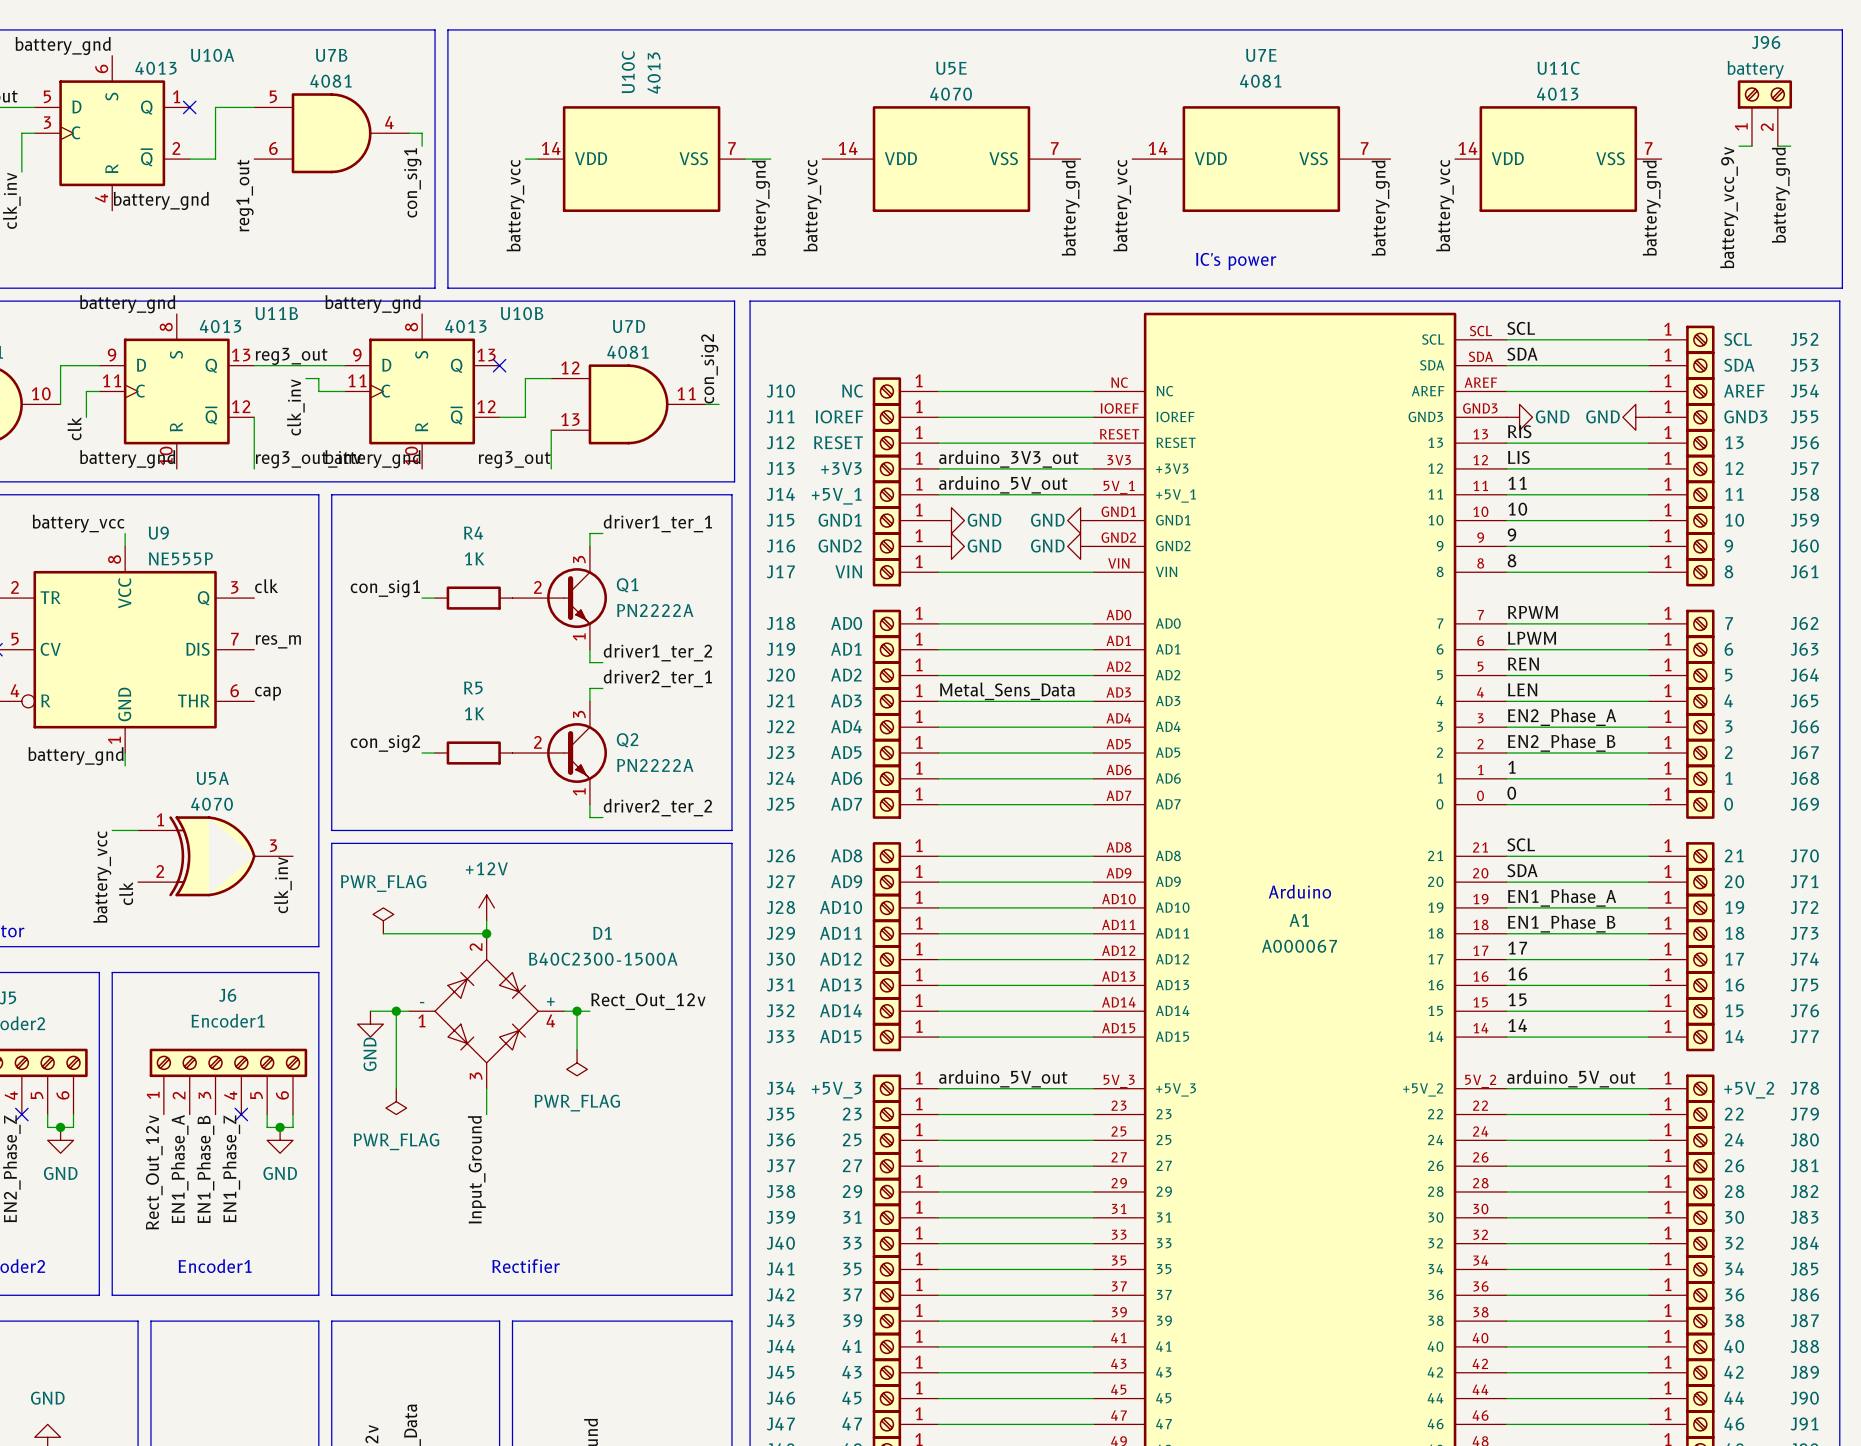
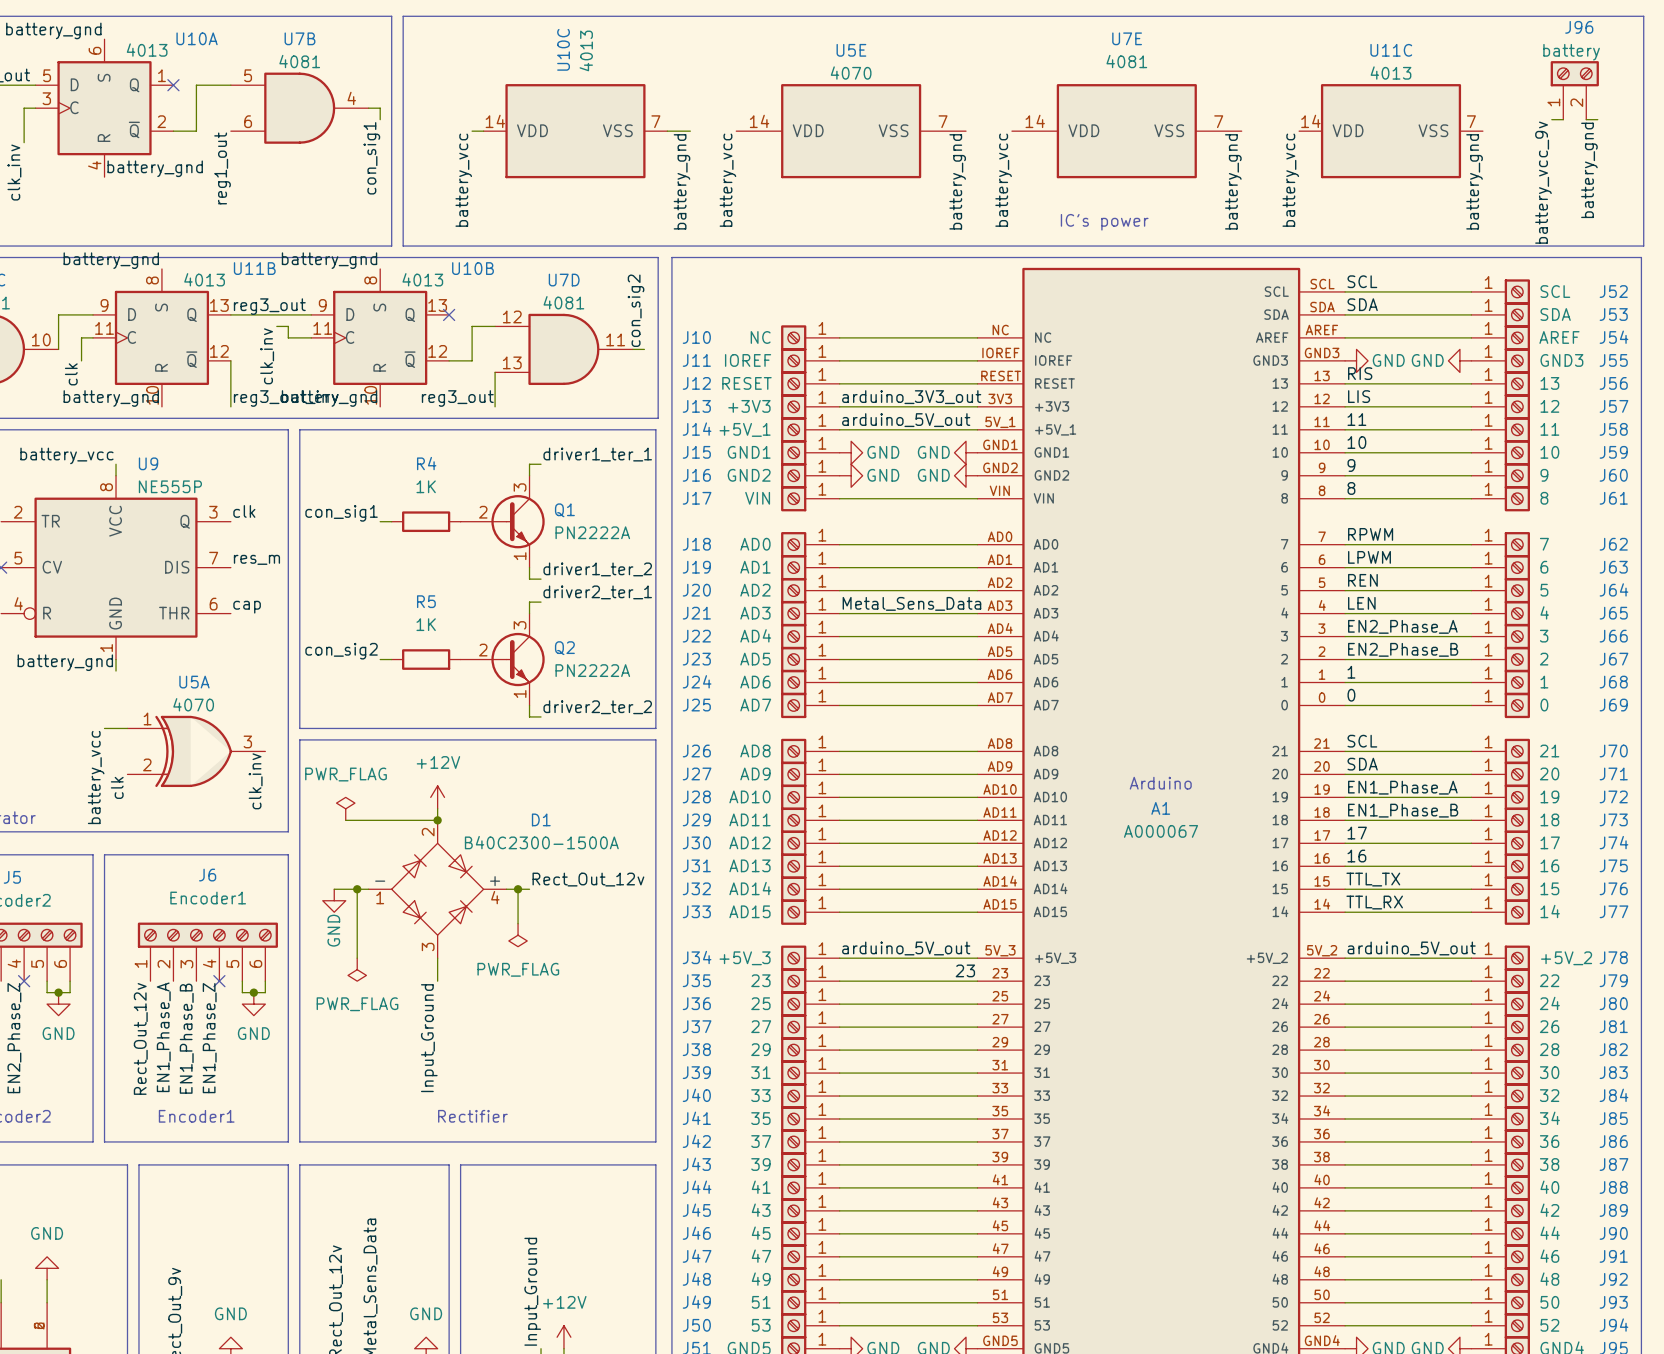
label: 15 (1517, 999) -> TTL_TX (1373, 879)
label: 14 (1517, 1025) -> TTL_RX (1374, 902)
label: none -> 23 (965, 970)

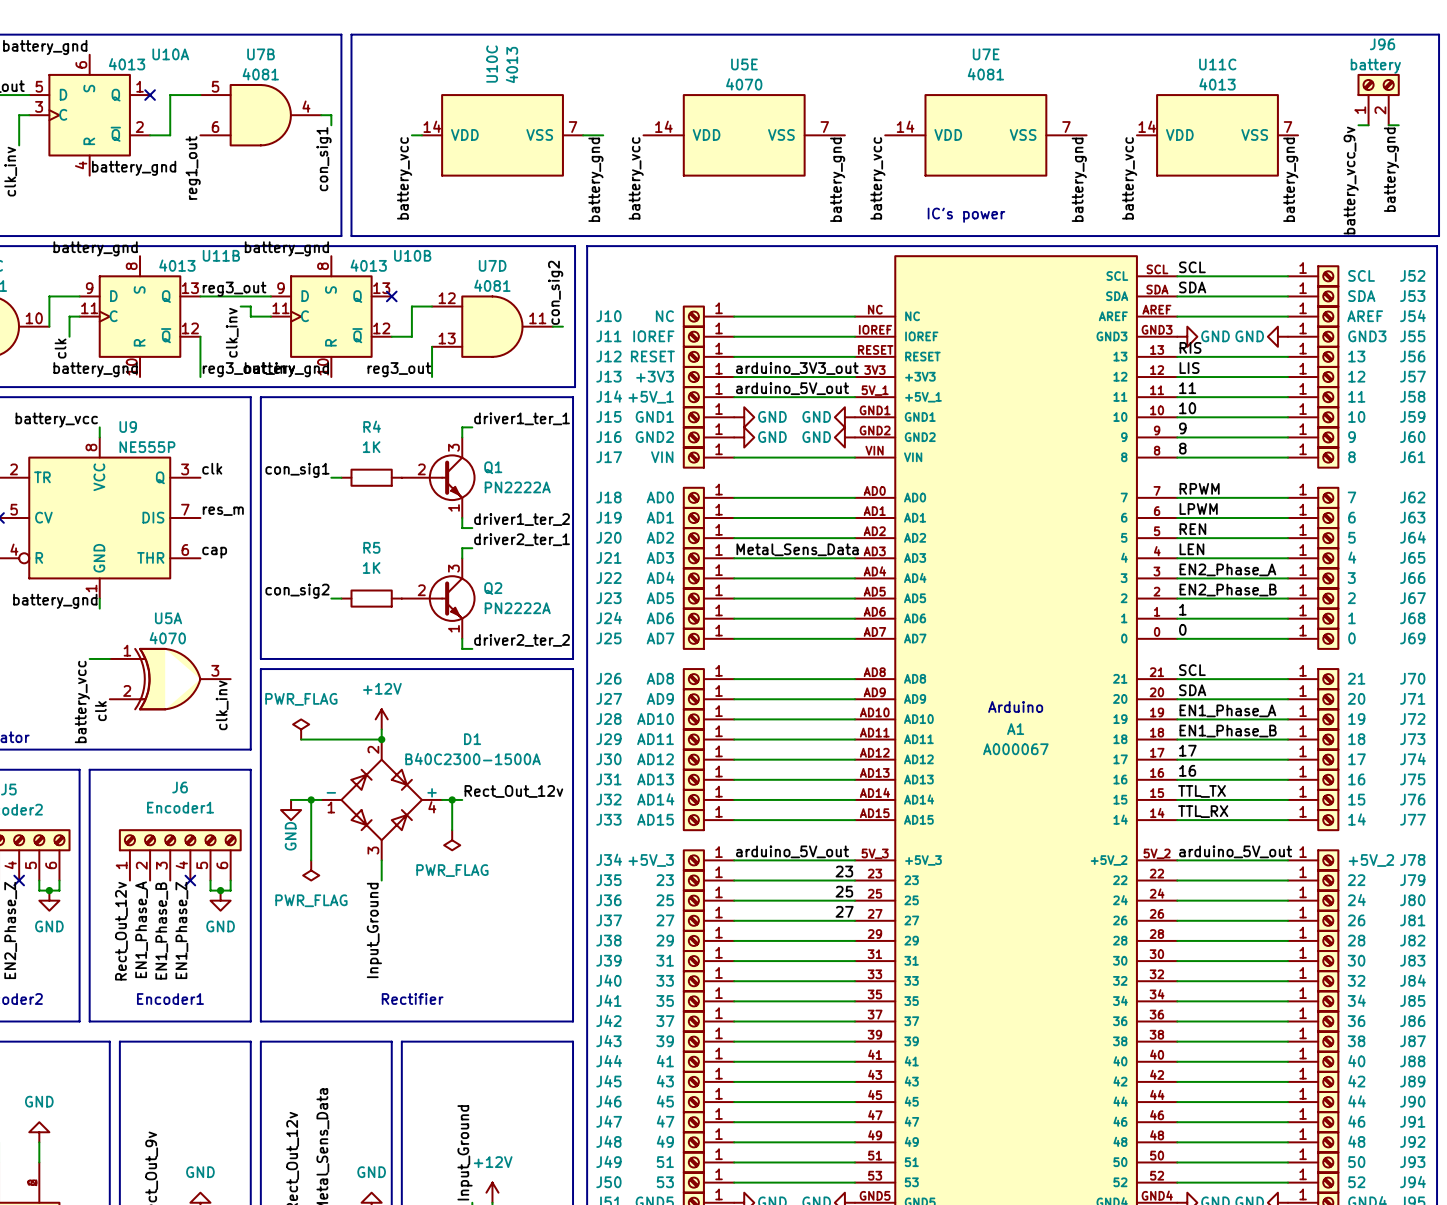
label: none -> 25 (844, 891)
label: none -> 27 (844, 911)

